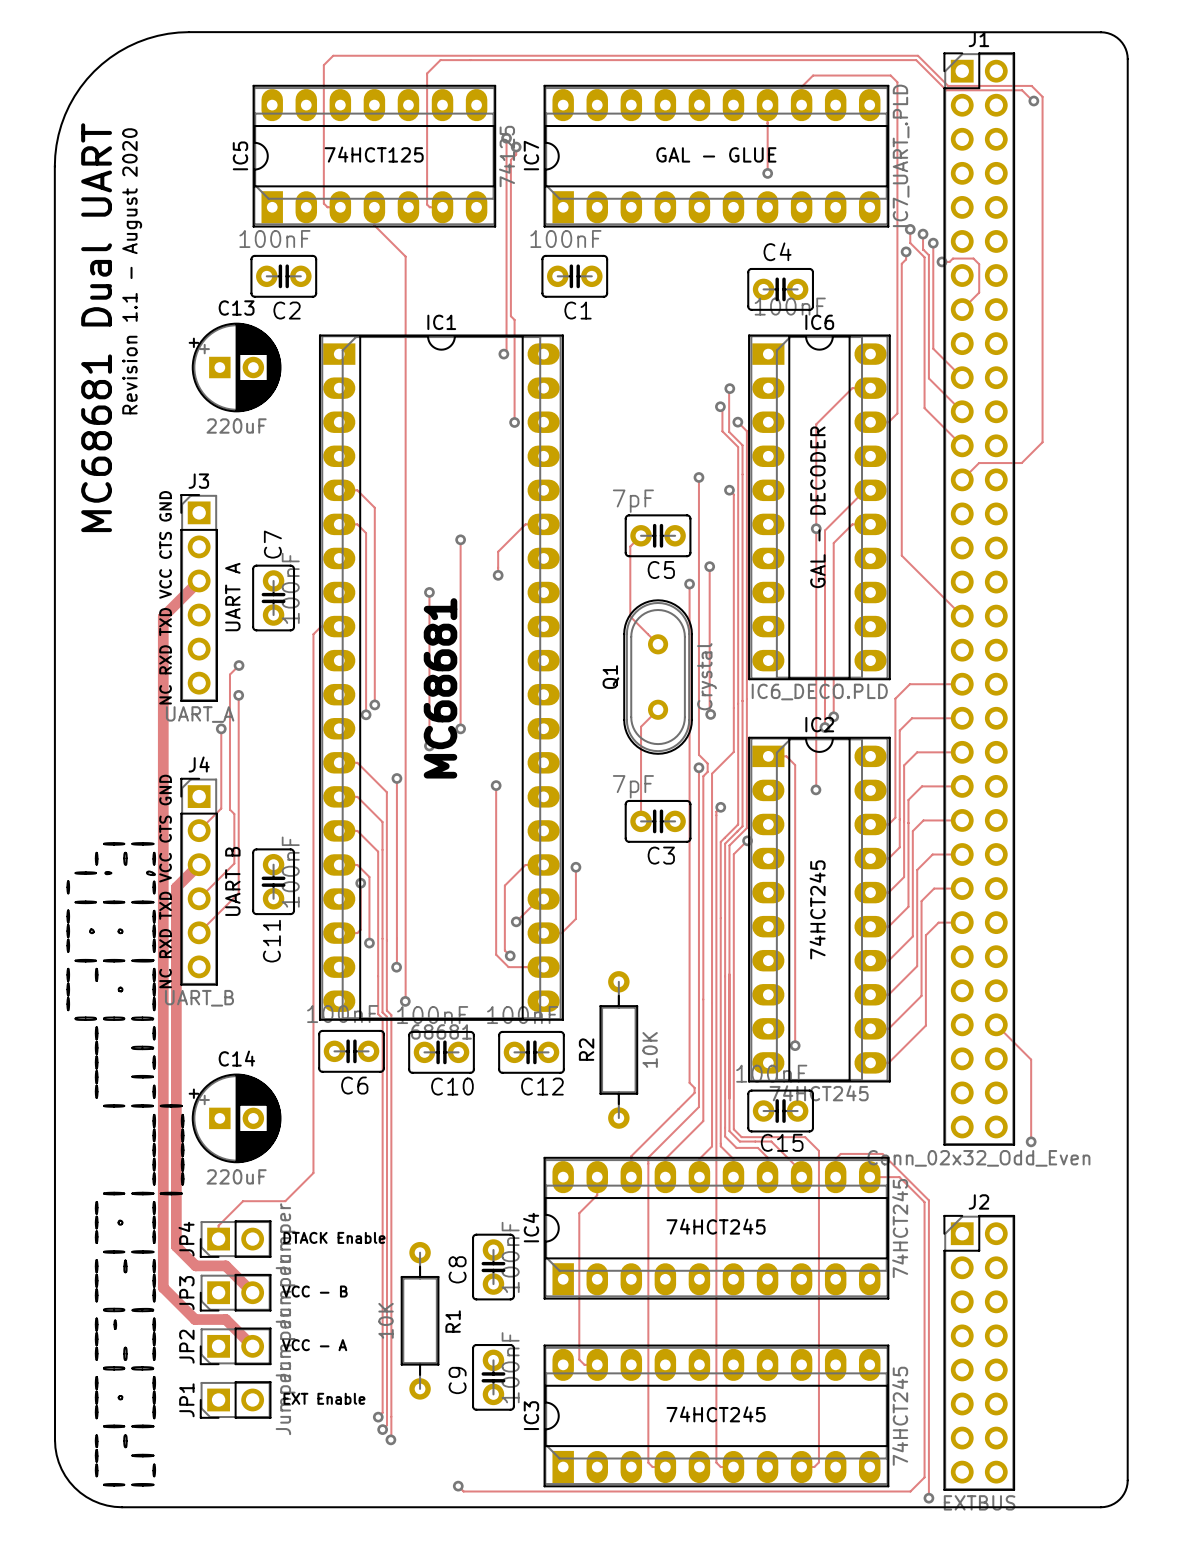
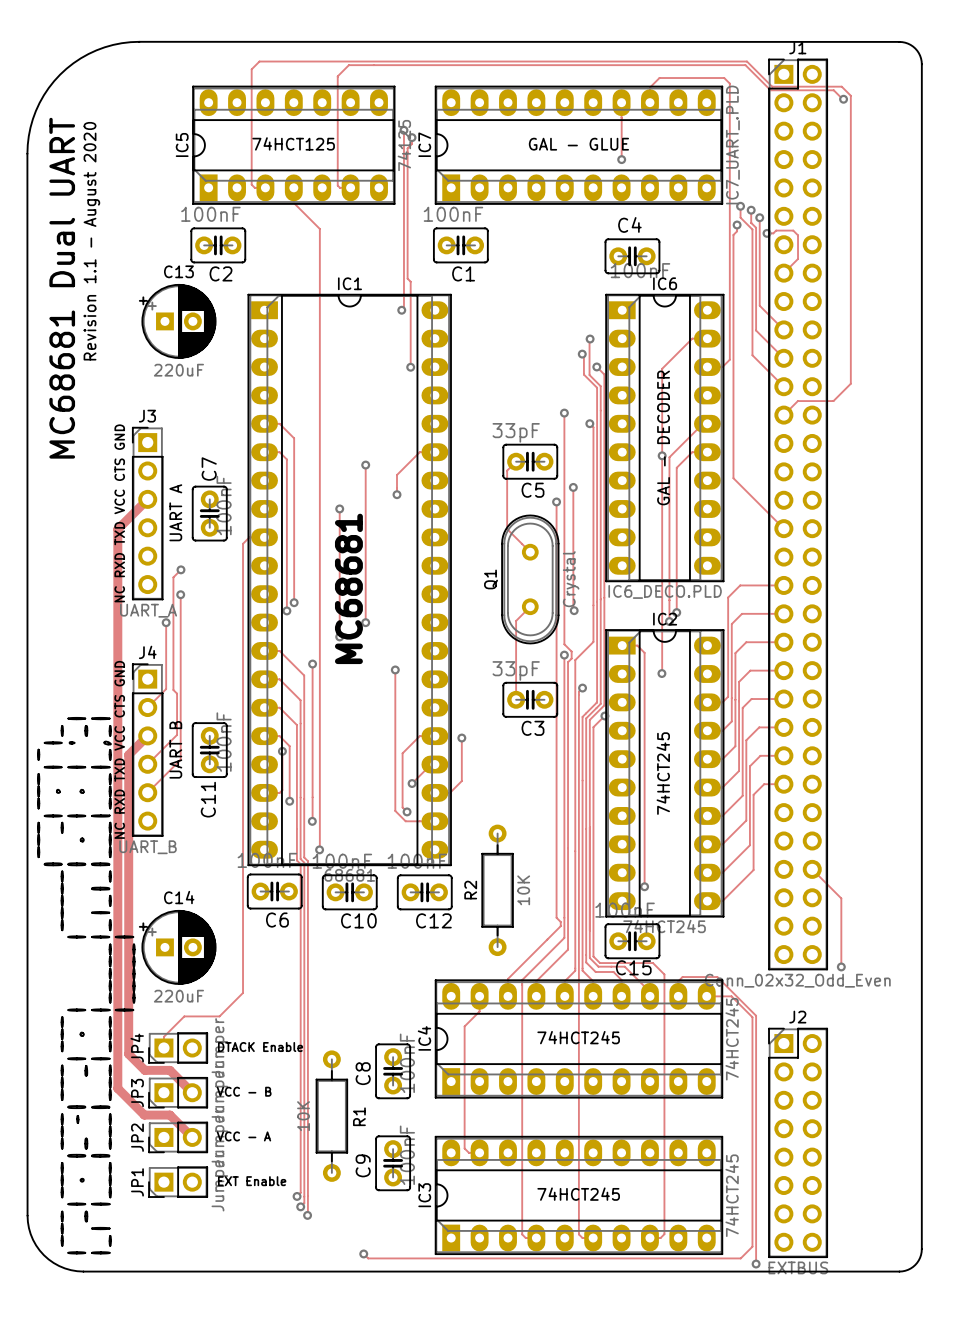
C5 value: 7pF (633, 501) -> 33pF (516, 432)
C3 value: 7pF (633, 786) -> 33pF (516, 670)

